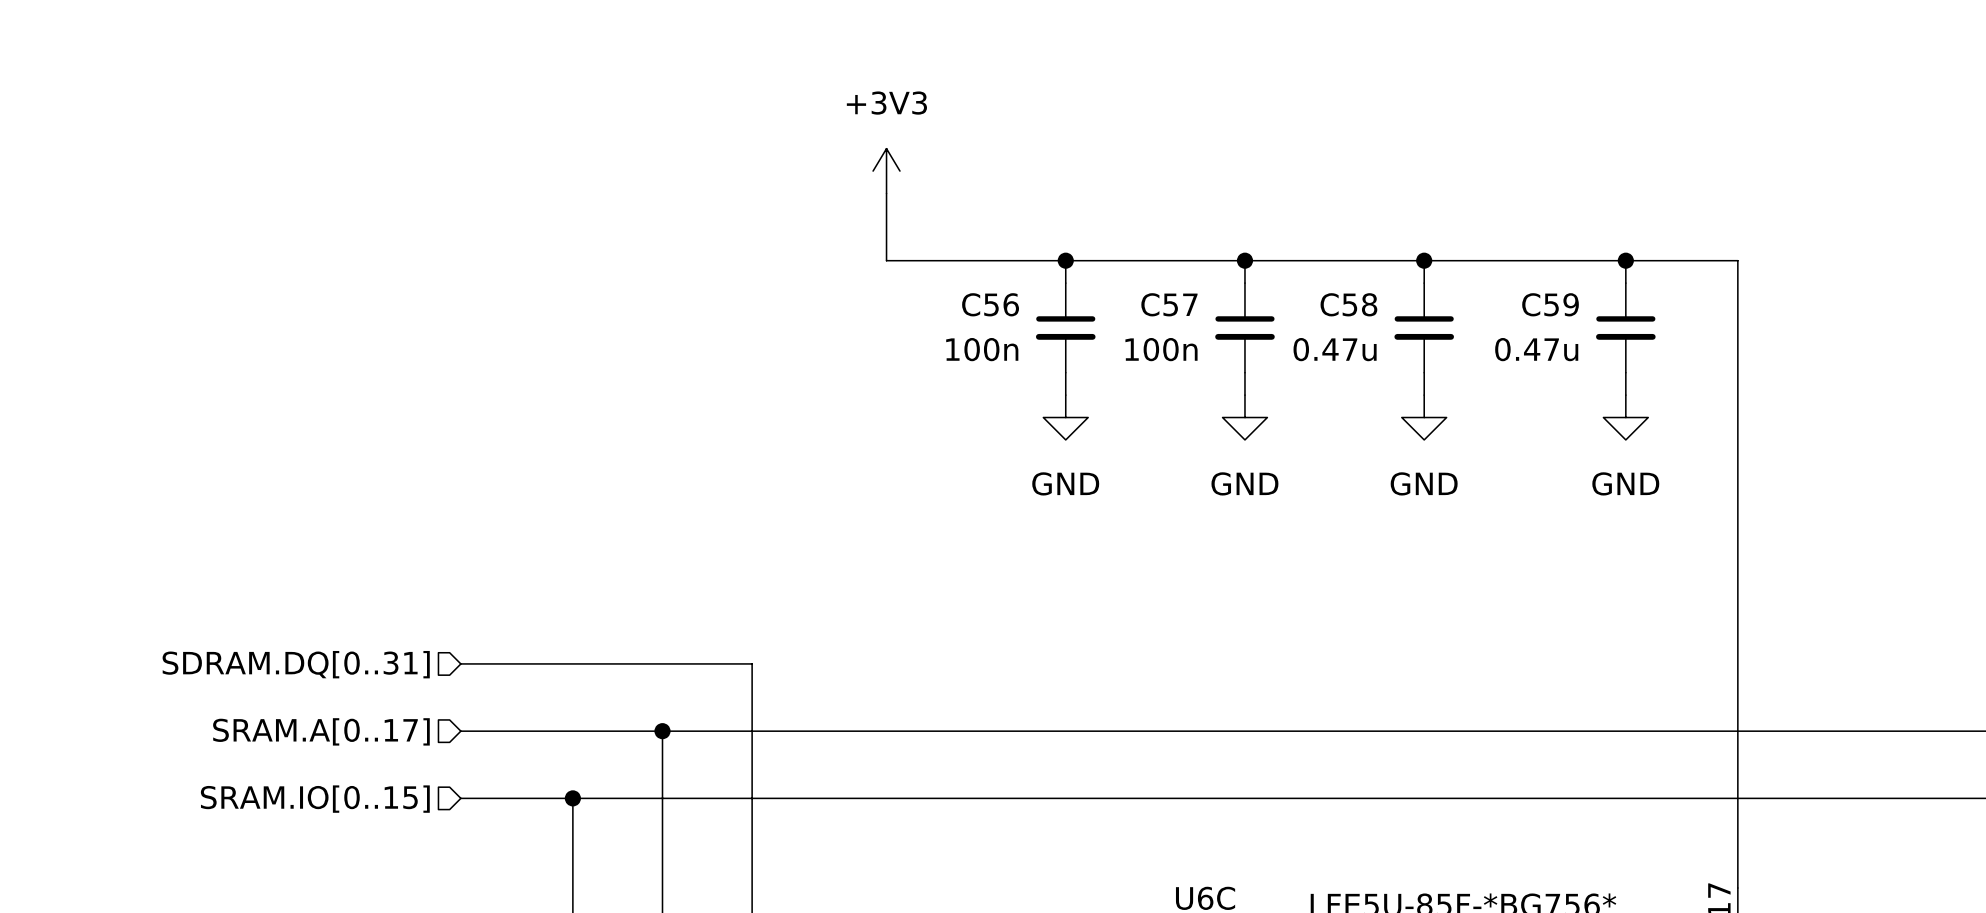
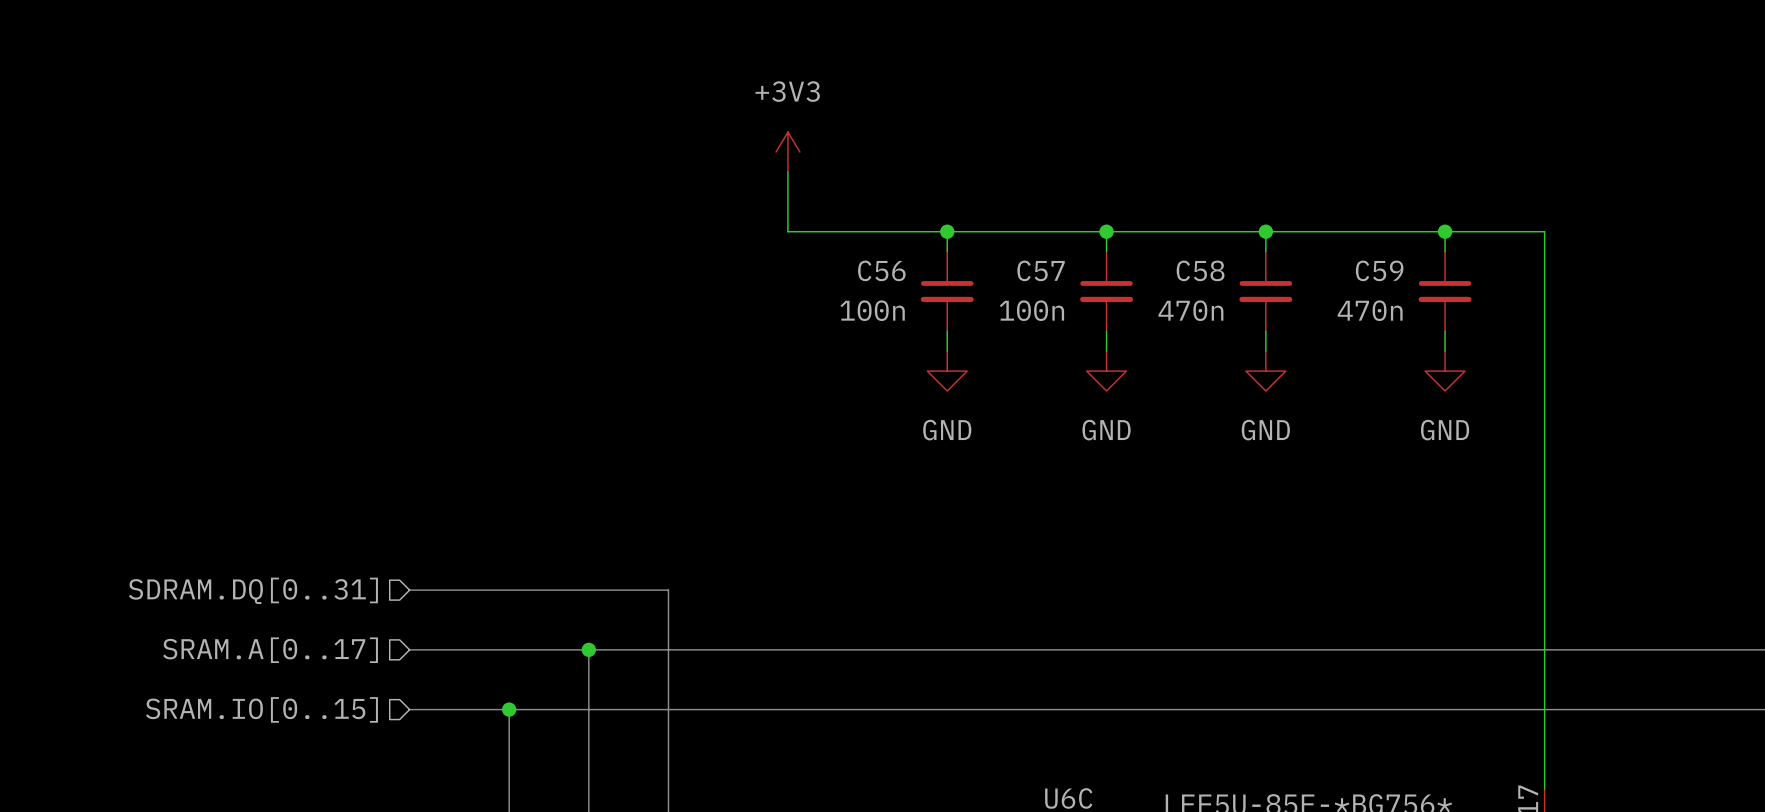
C58 value: 0.47u (1335, 349) -> 470n (1190, 310)
C59 value: 0.47u (1536, 349) -> 470n (1370, 310)

